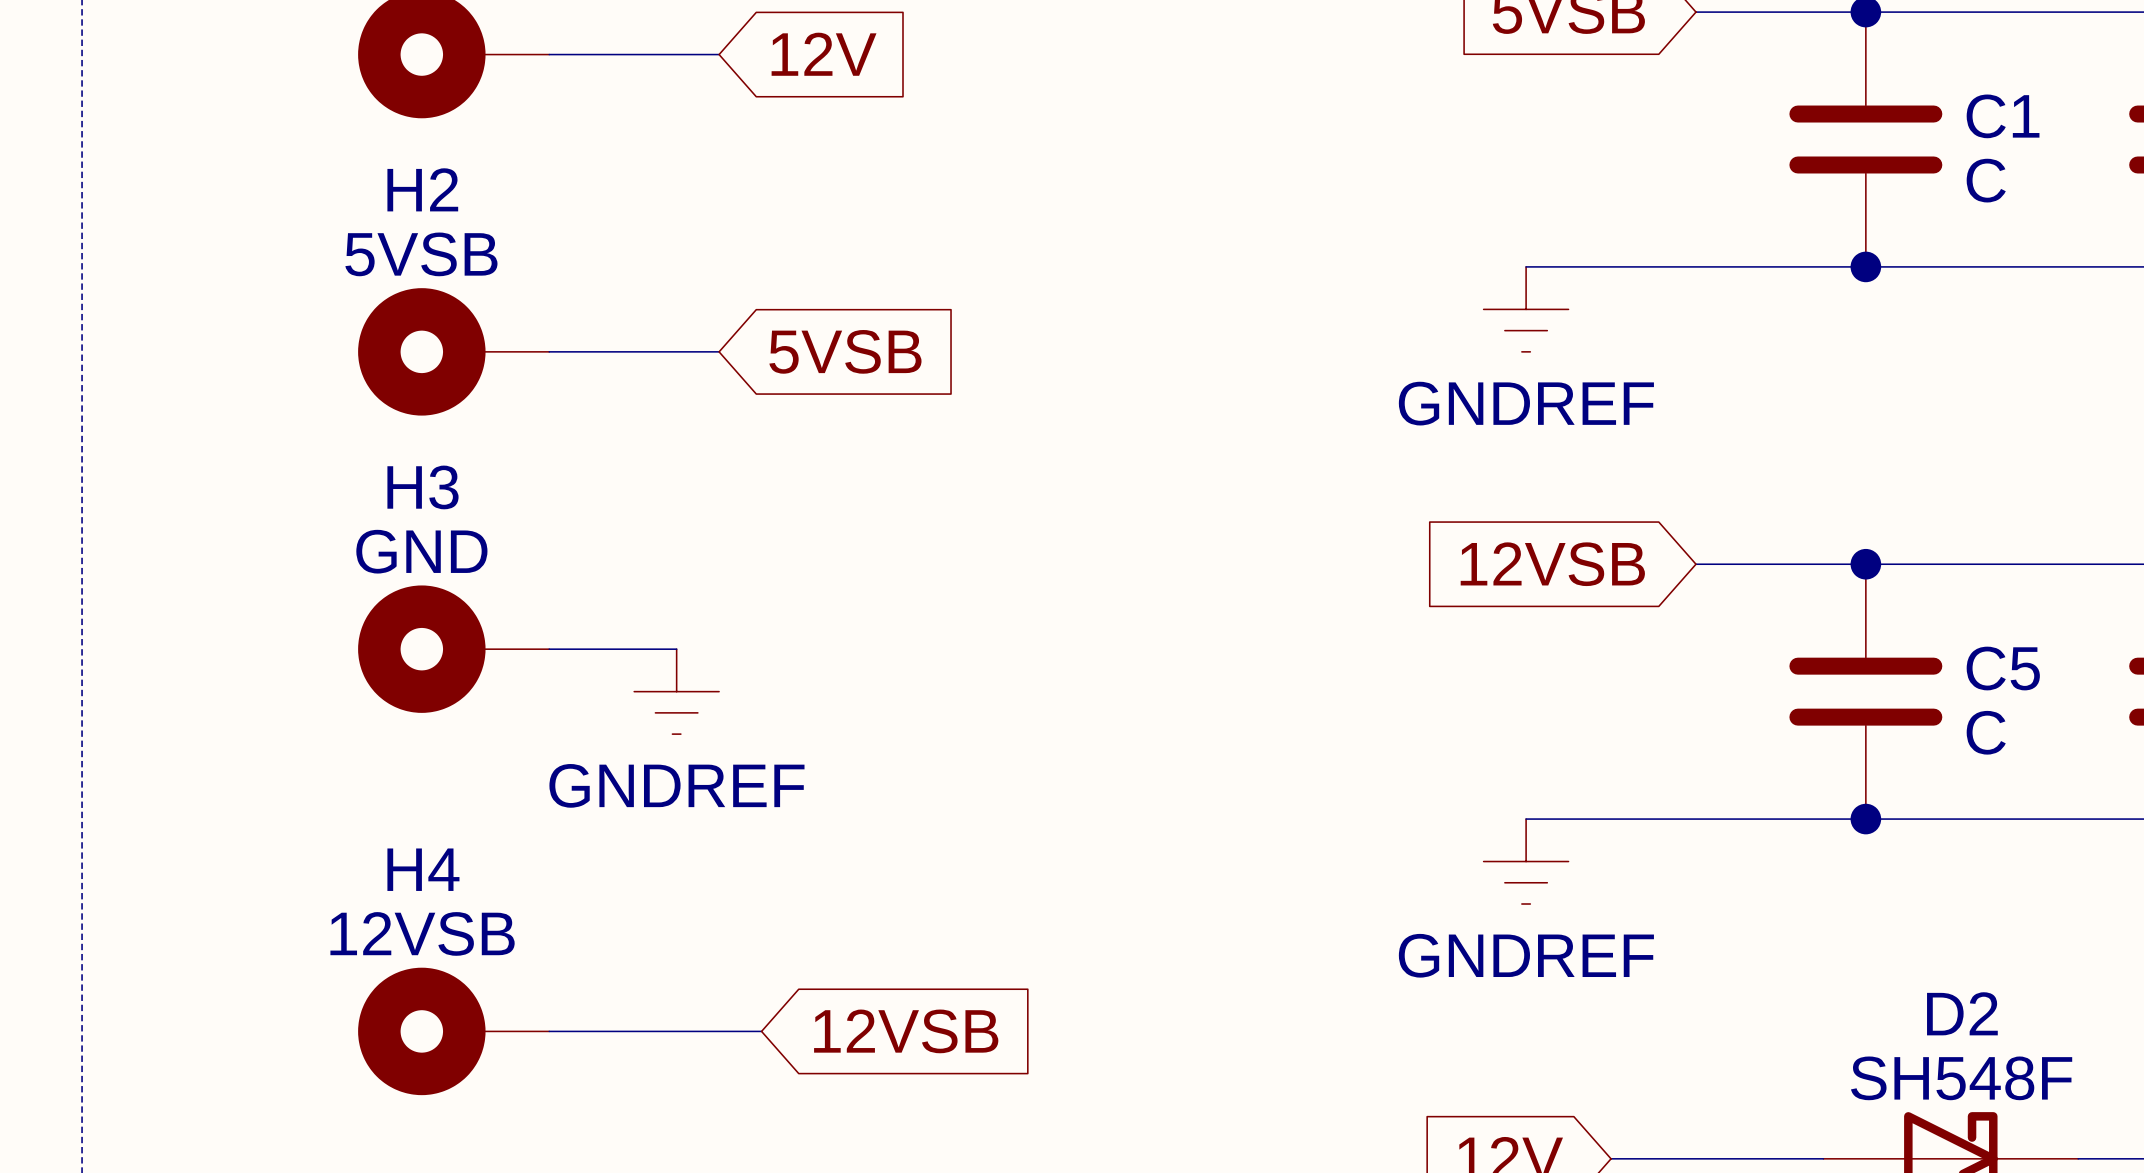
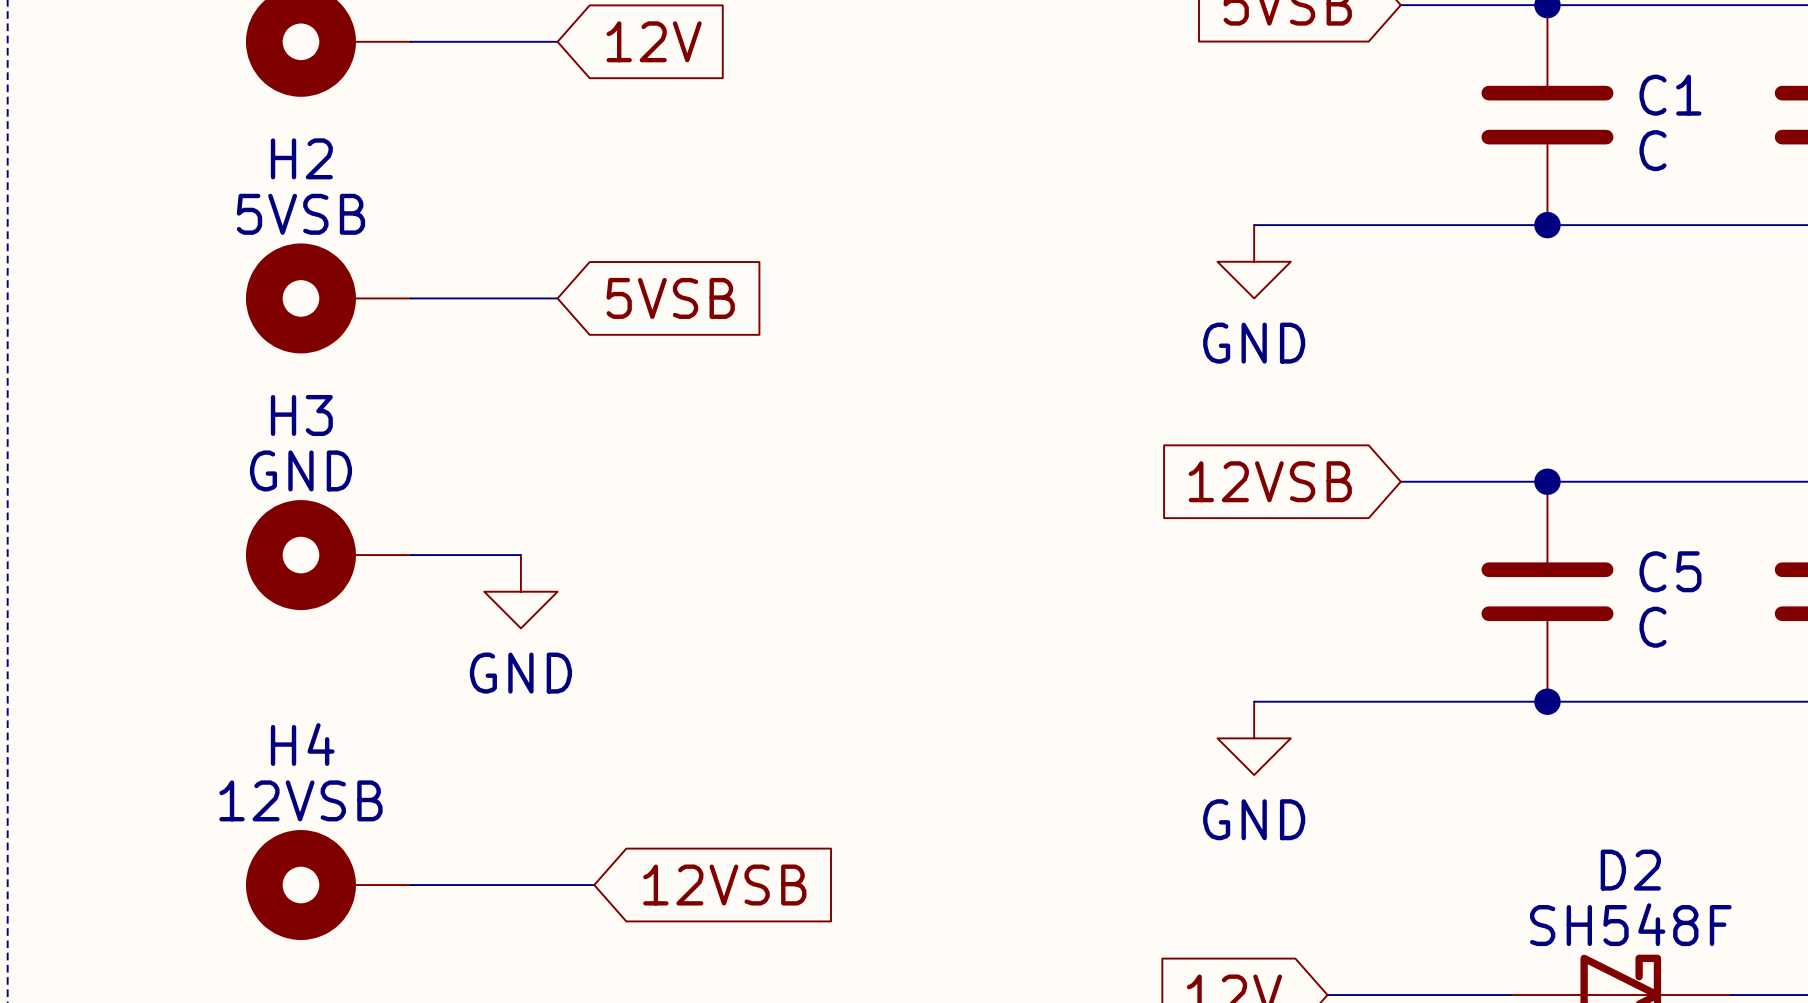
power symbol: GNDREF (1526, 309) -> GND (1254, 261)
power symbol: GNDREF (676, 691) -> GND (520, 591)
power symbol: GNDREF (1526, 861) -> GND (1254, 738)

